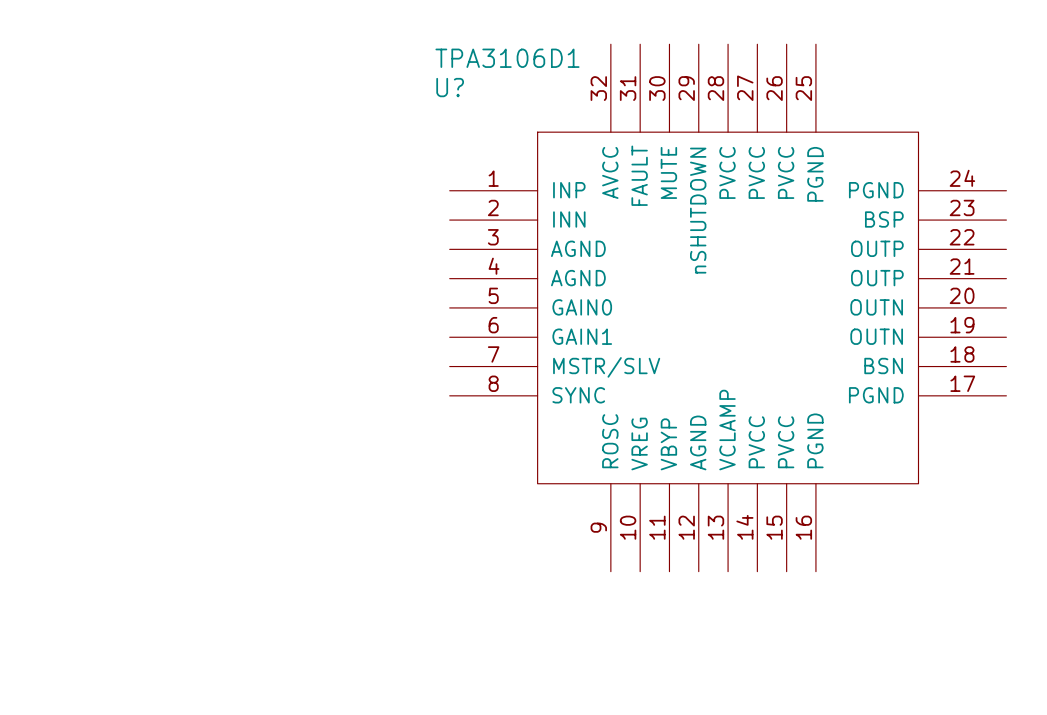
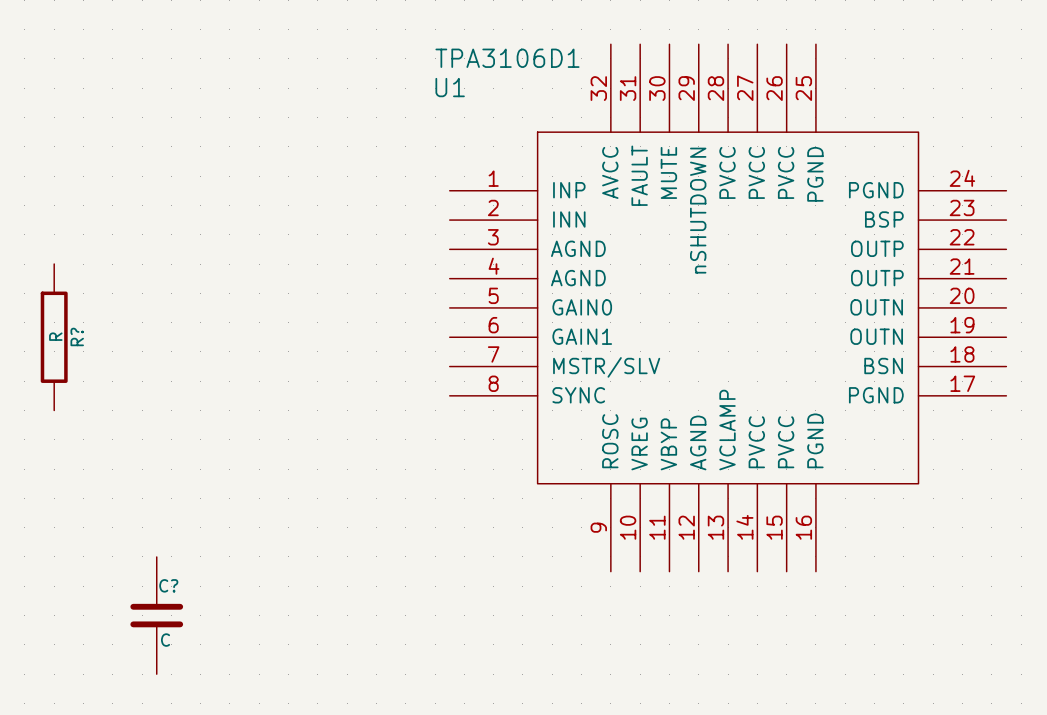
U? name: U? (450, 87) -> U1 (450, 87)
R?: none -> R (54, 337)
C?: none -> C (156, 615)

